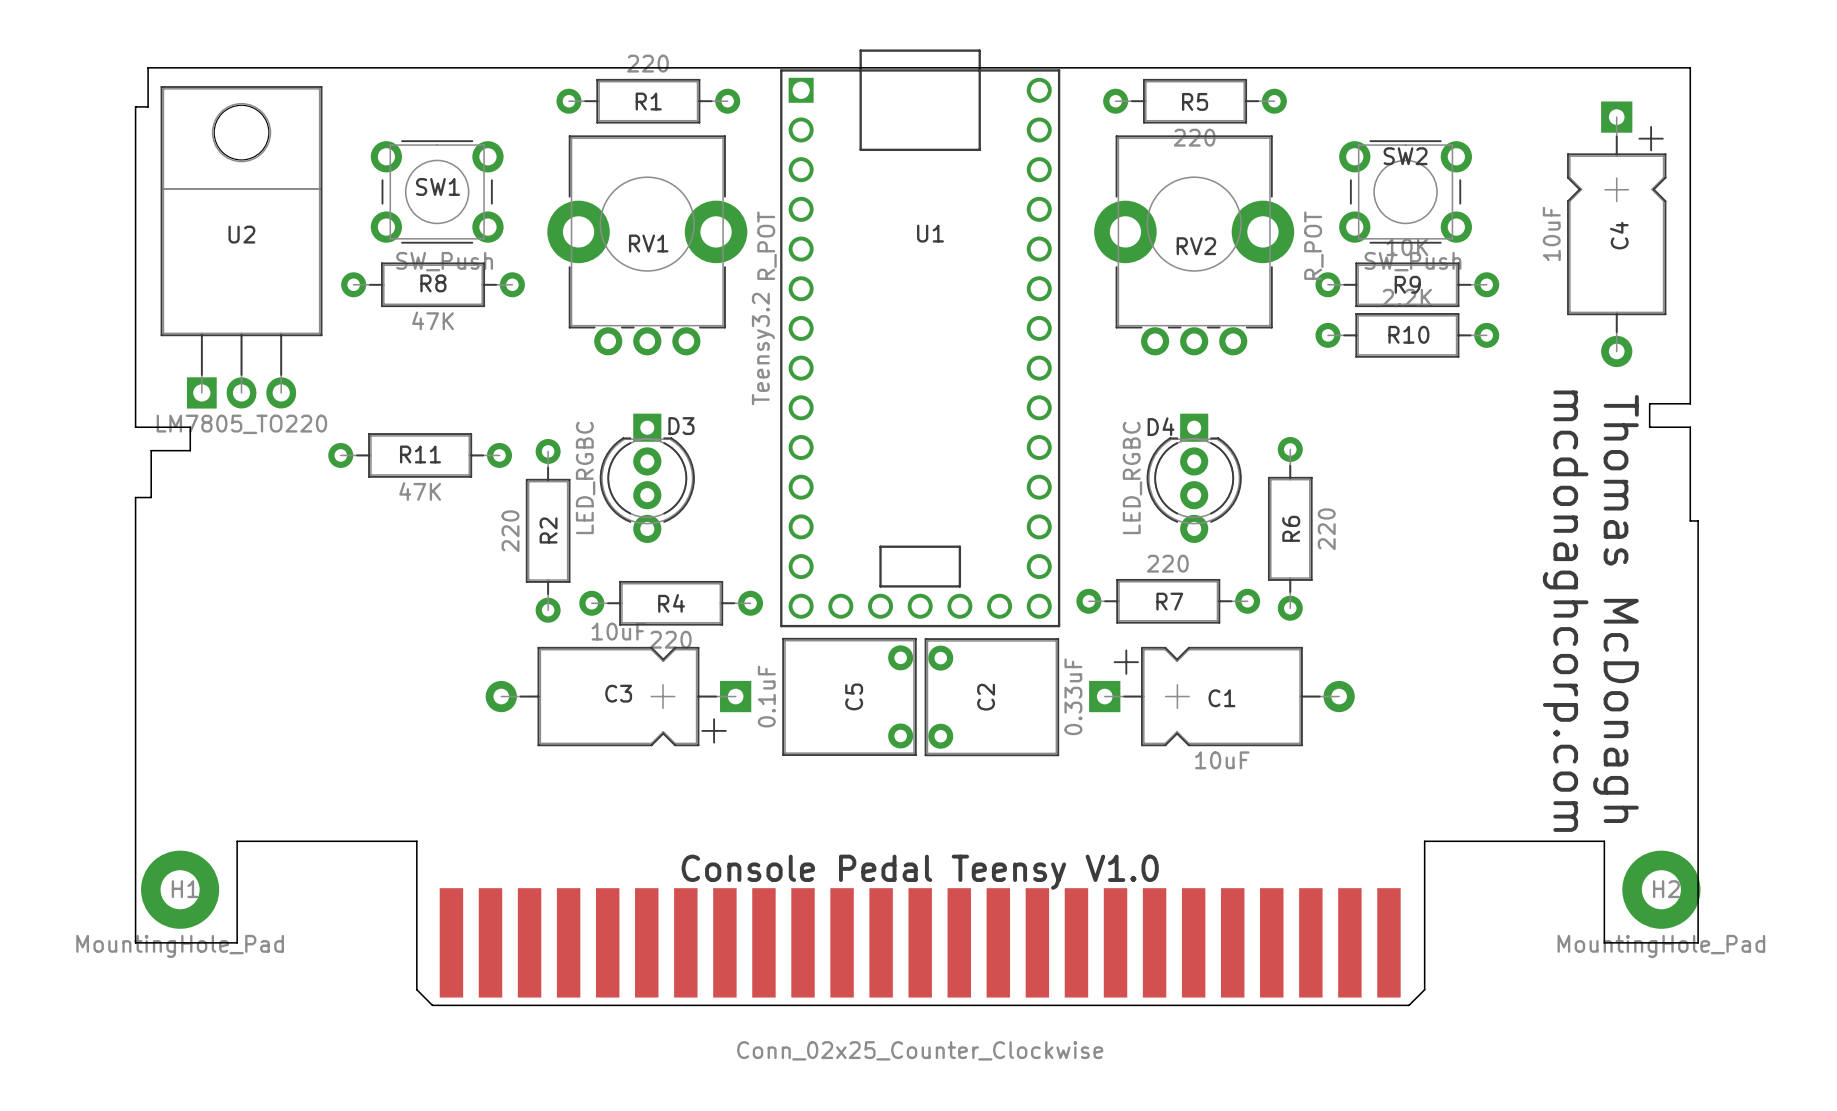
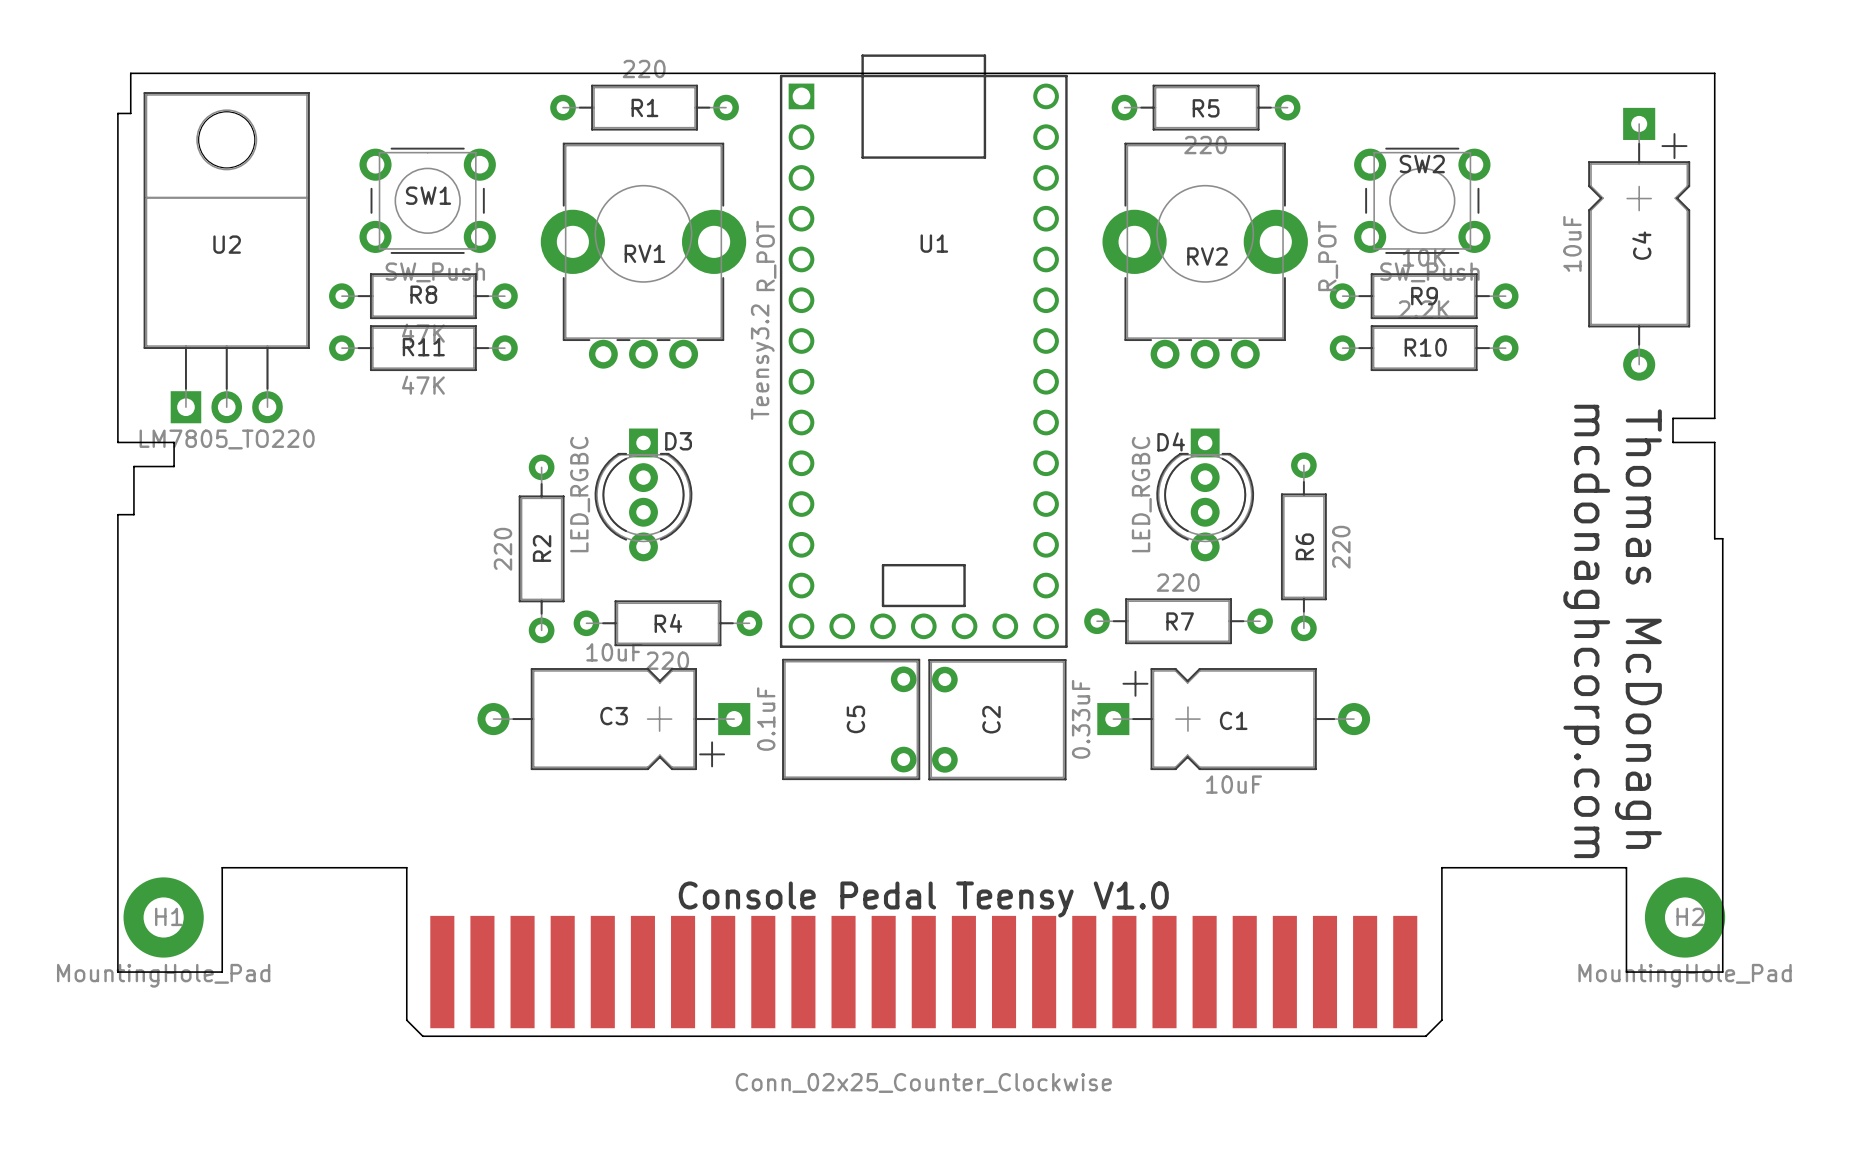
R11 position: (420, 455) -> (423, 348)

